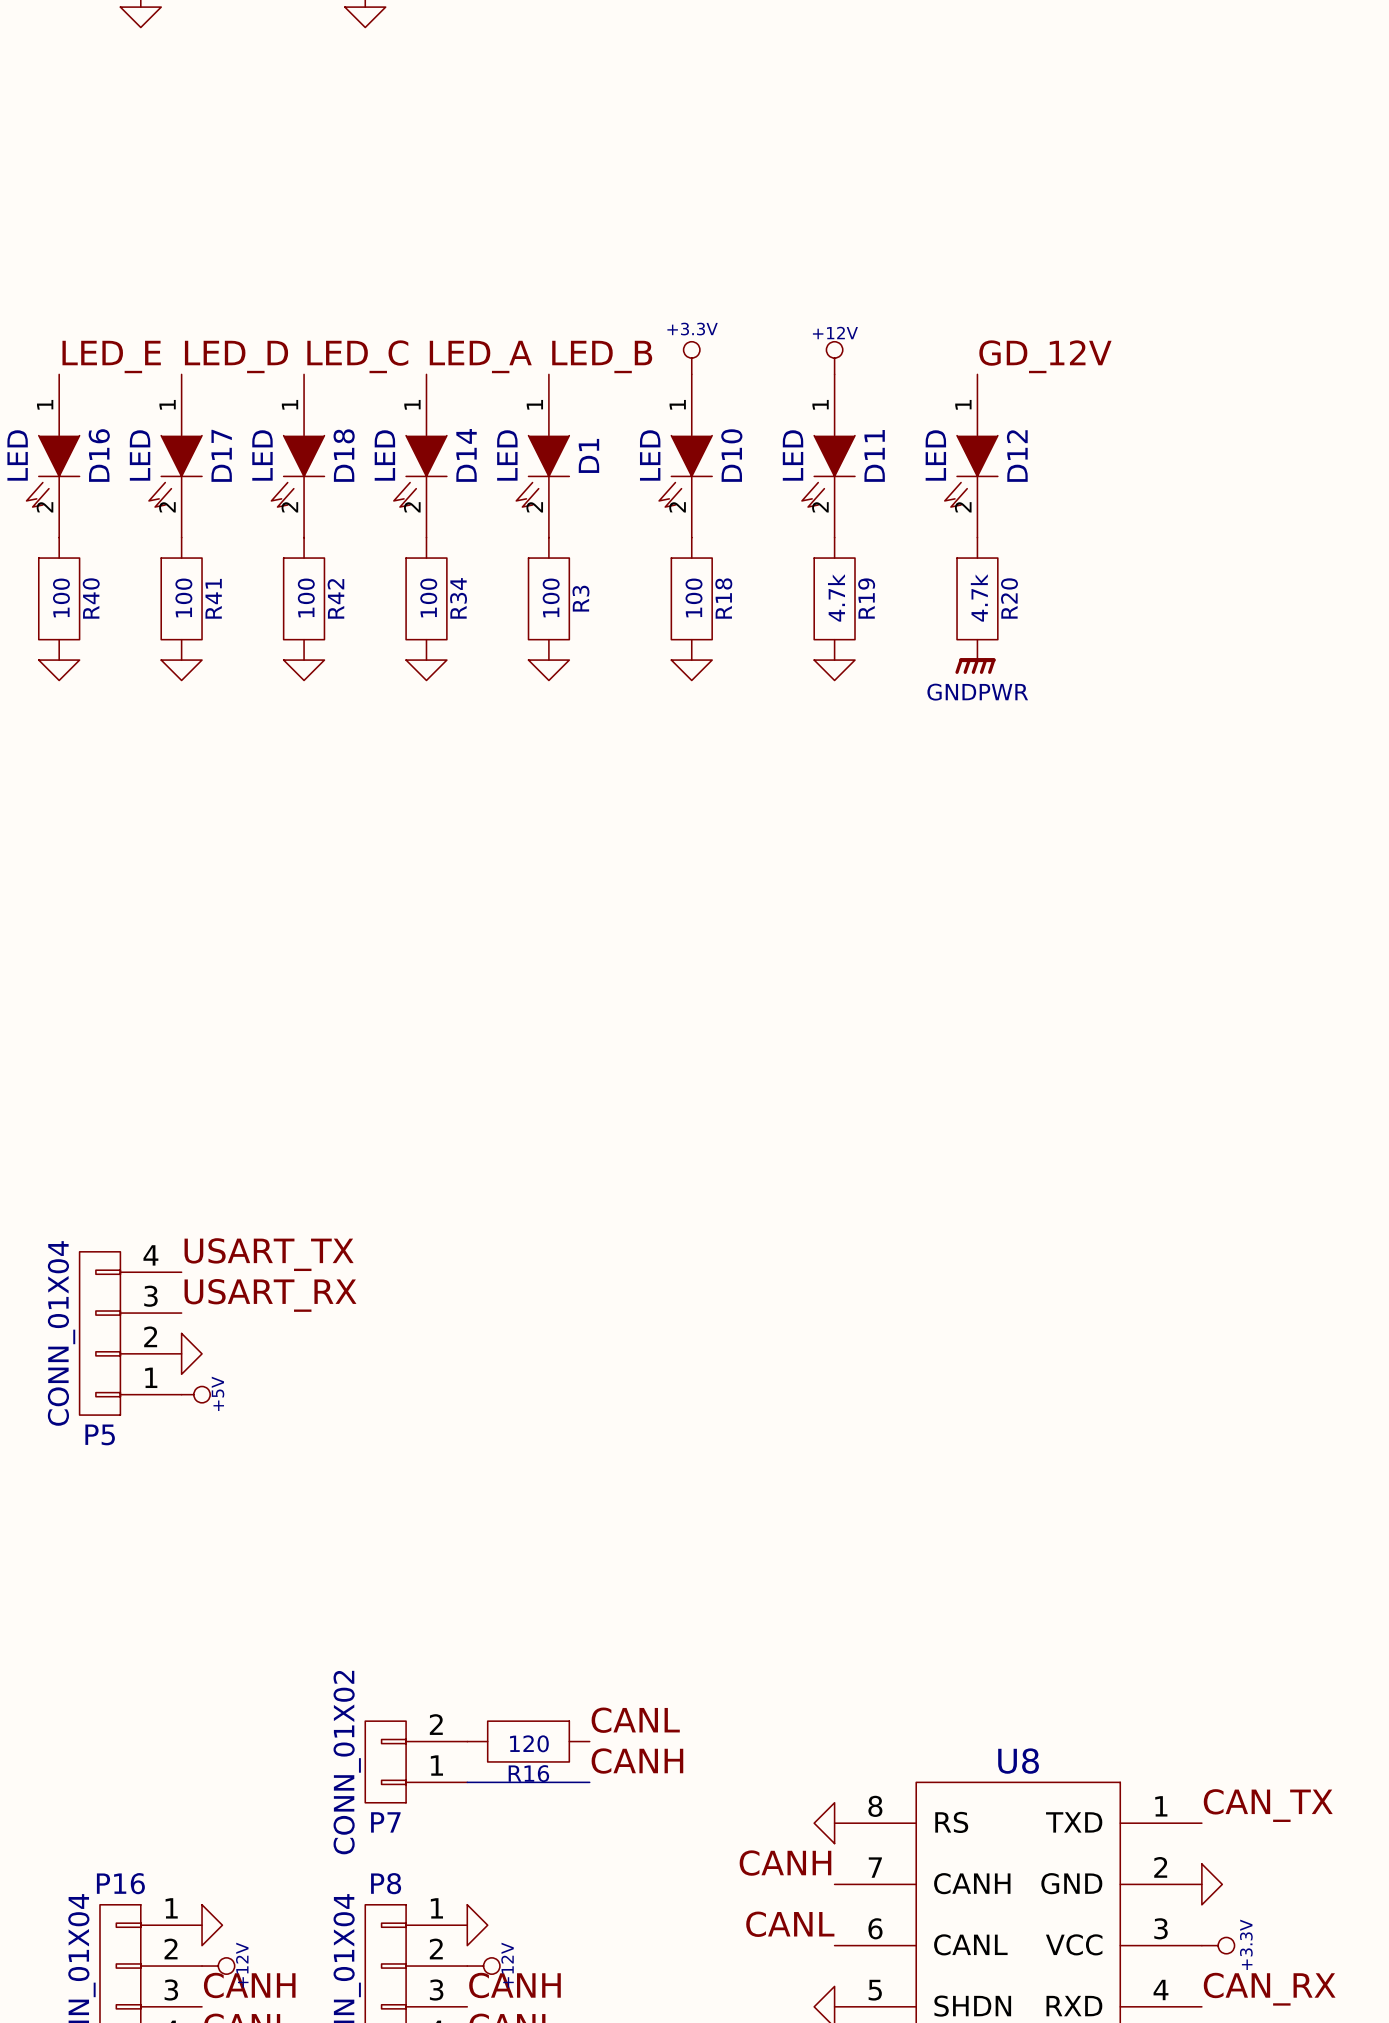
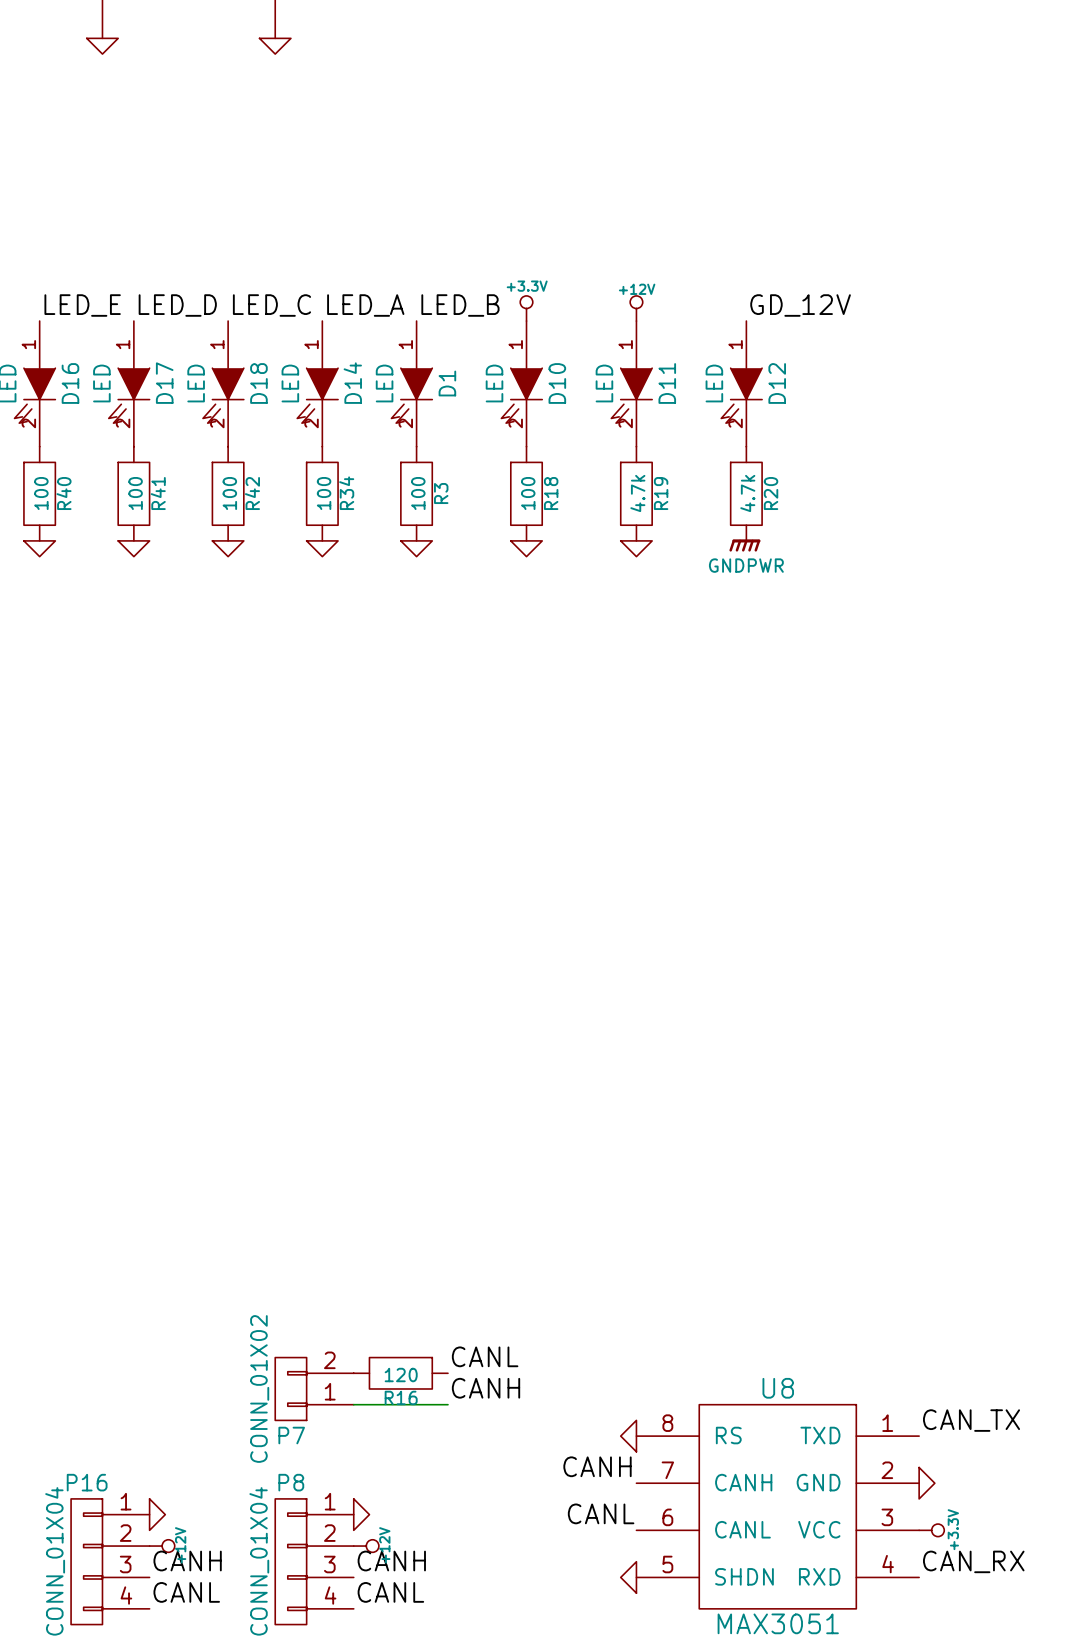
label: USART_TX (269, 1254) -> none
label: USART_RX (270, 1295) -> none
P5: CONN_01X04 (130, 1333) -> none
power symbol: (191, 1353) -> none
power symbol: +5V (195, 1394) -> none

